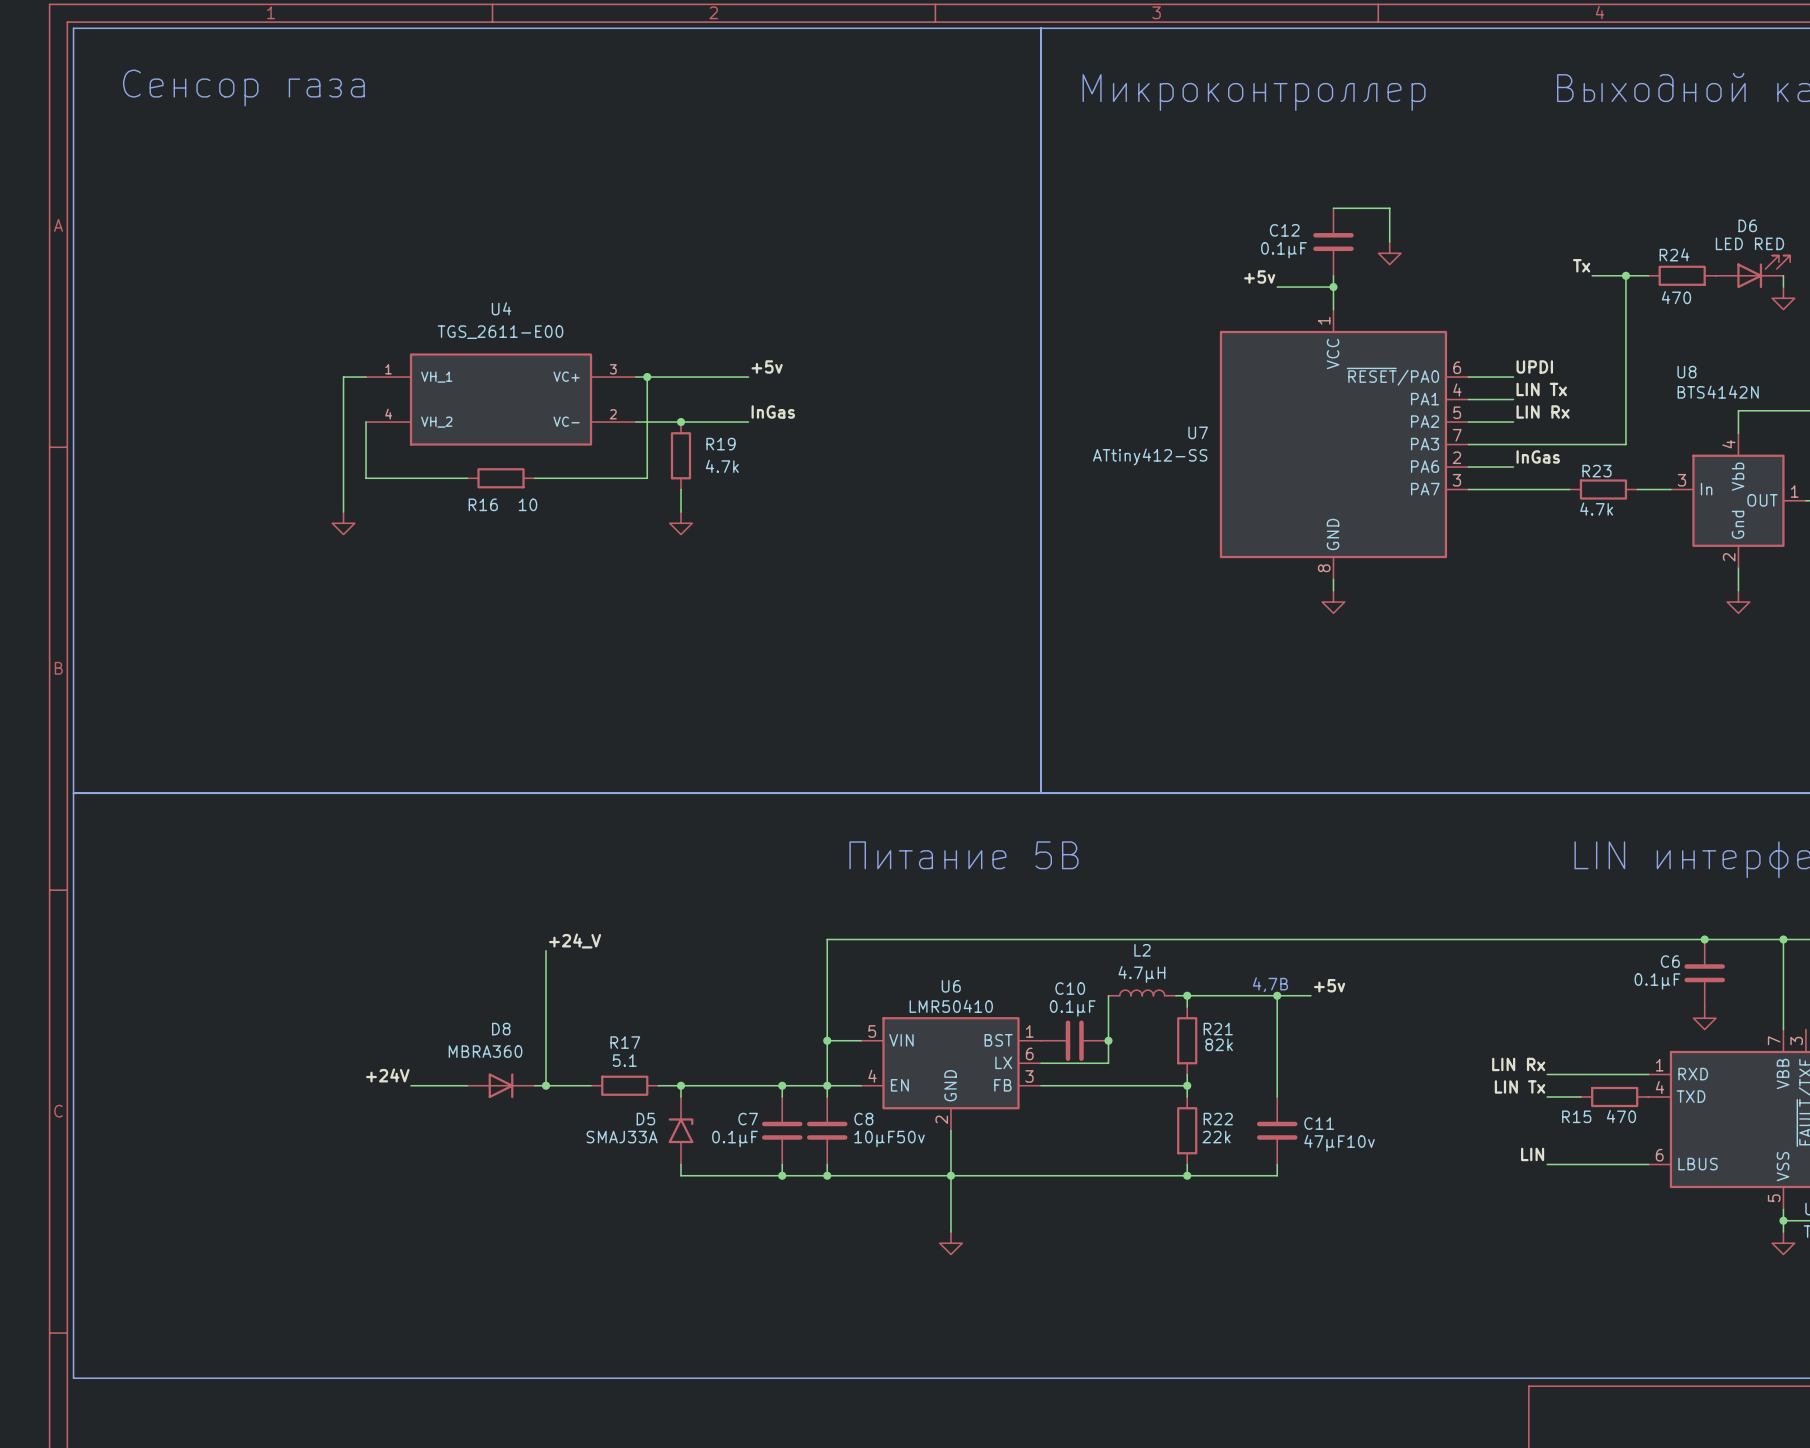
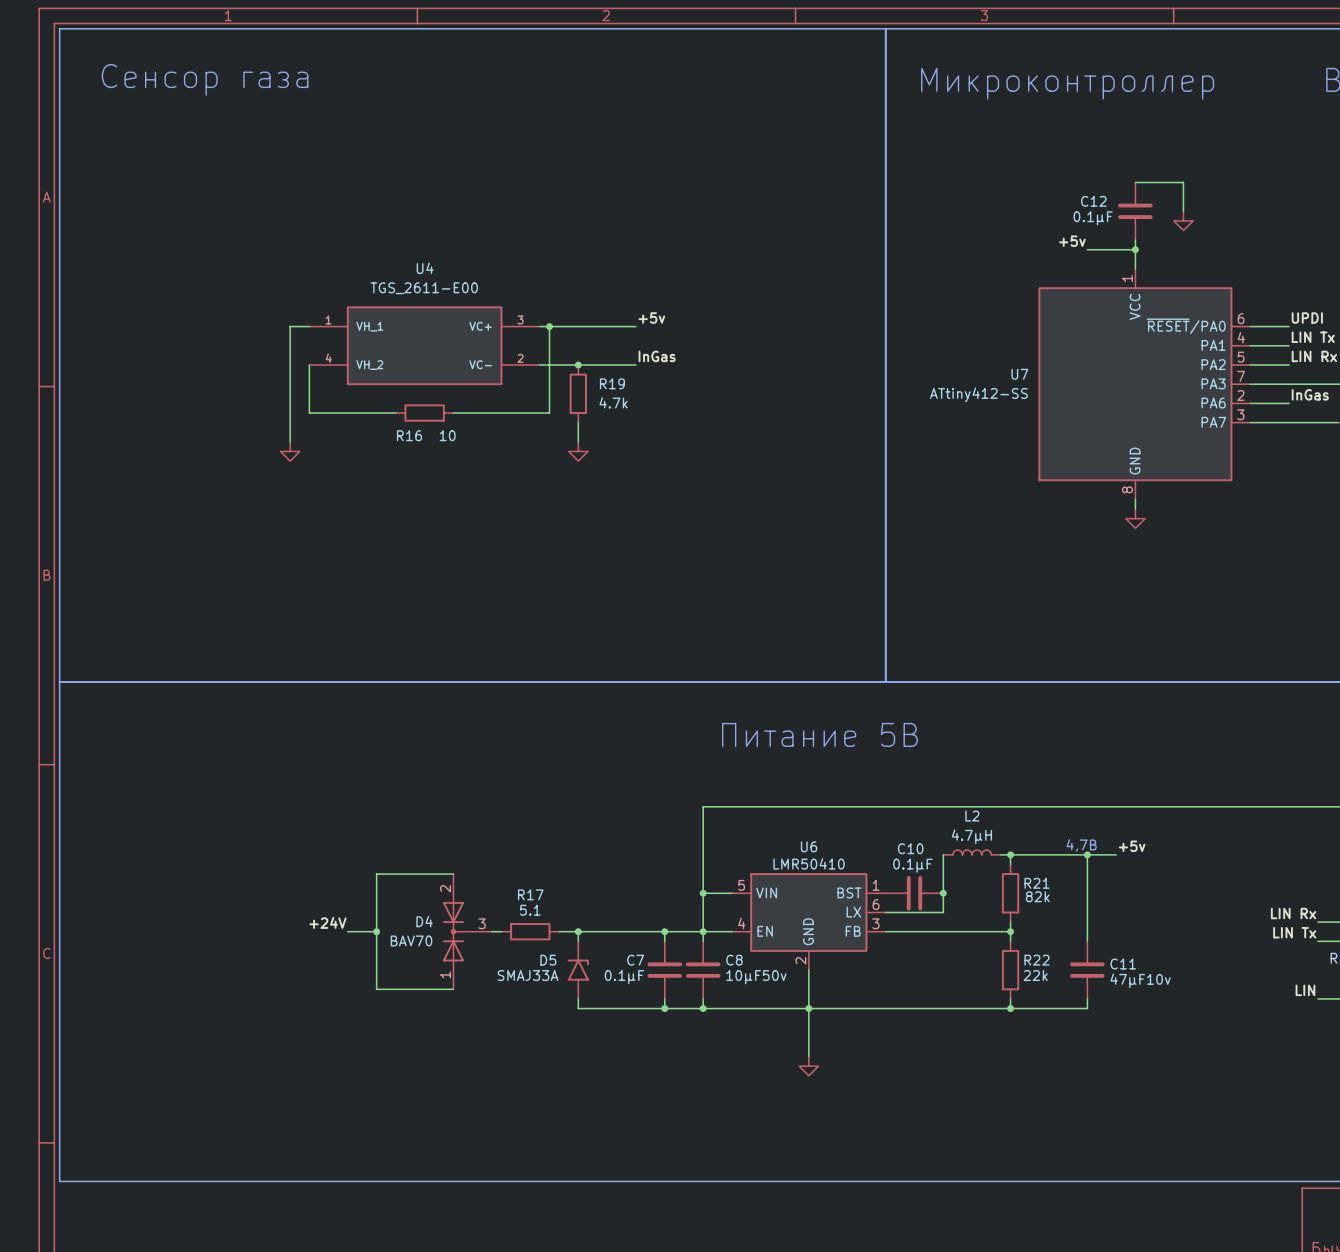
label: +24_V (575, 940) -> none
wire: (546, 950) (546, 1085) -> none
wire: none -> (453, 874) (376, 874) (376, 989) (453, 989)
wire: (444, 1085) (467, 1085) -> none
junction: none -> (376, 931)
D8: MBRA360 (501, 1085) -> none
junction: (546, 1085) -> none
D4: none -> BAV70 (467, 931)

